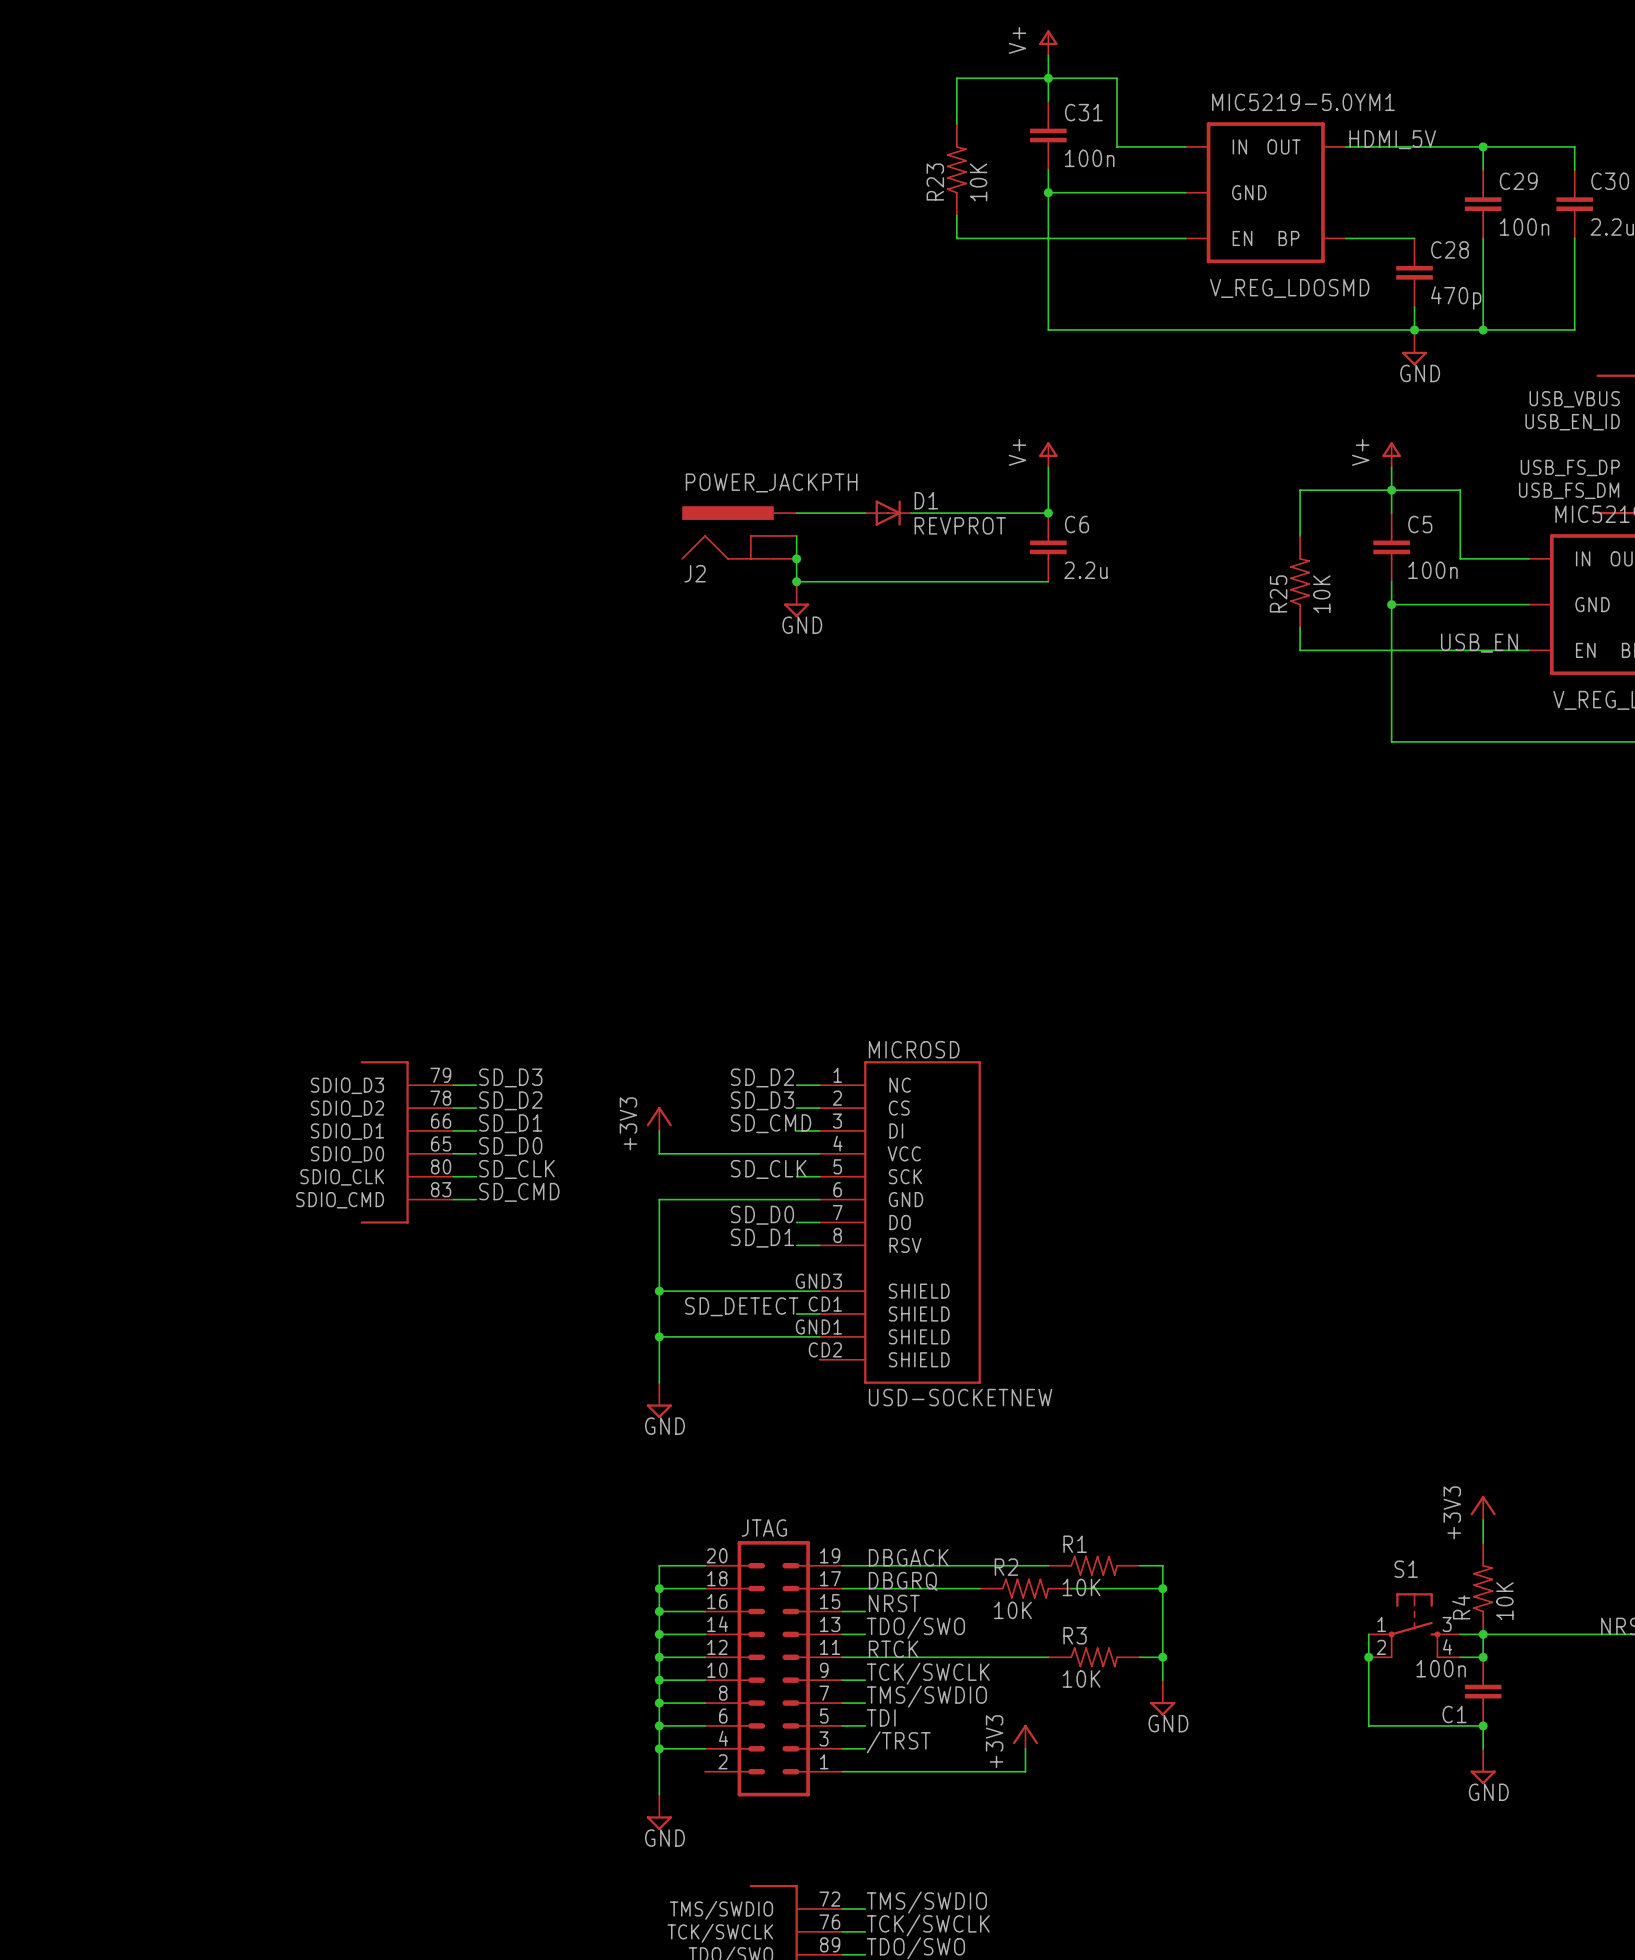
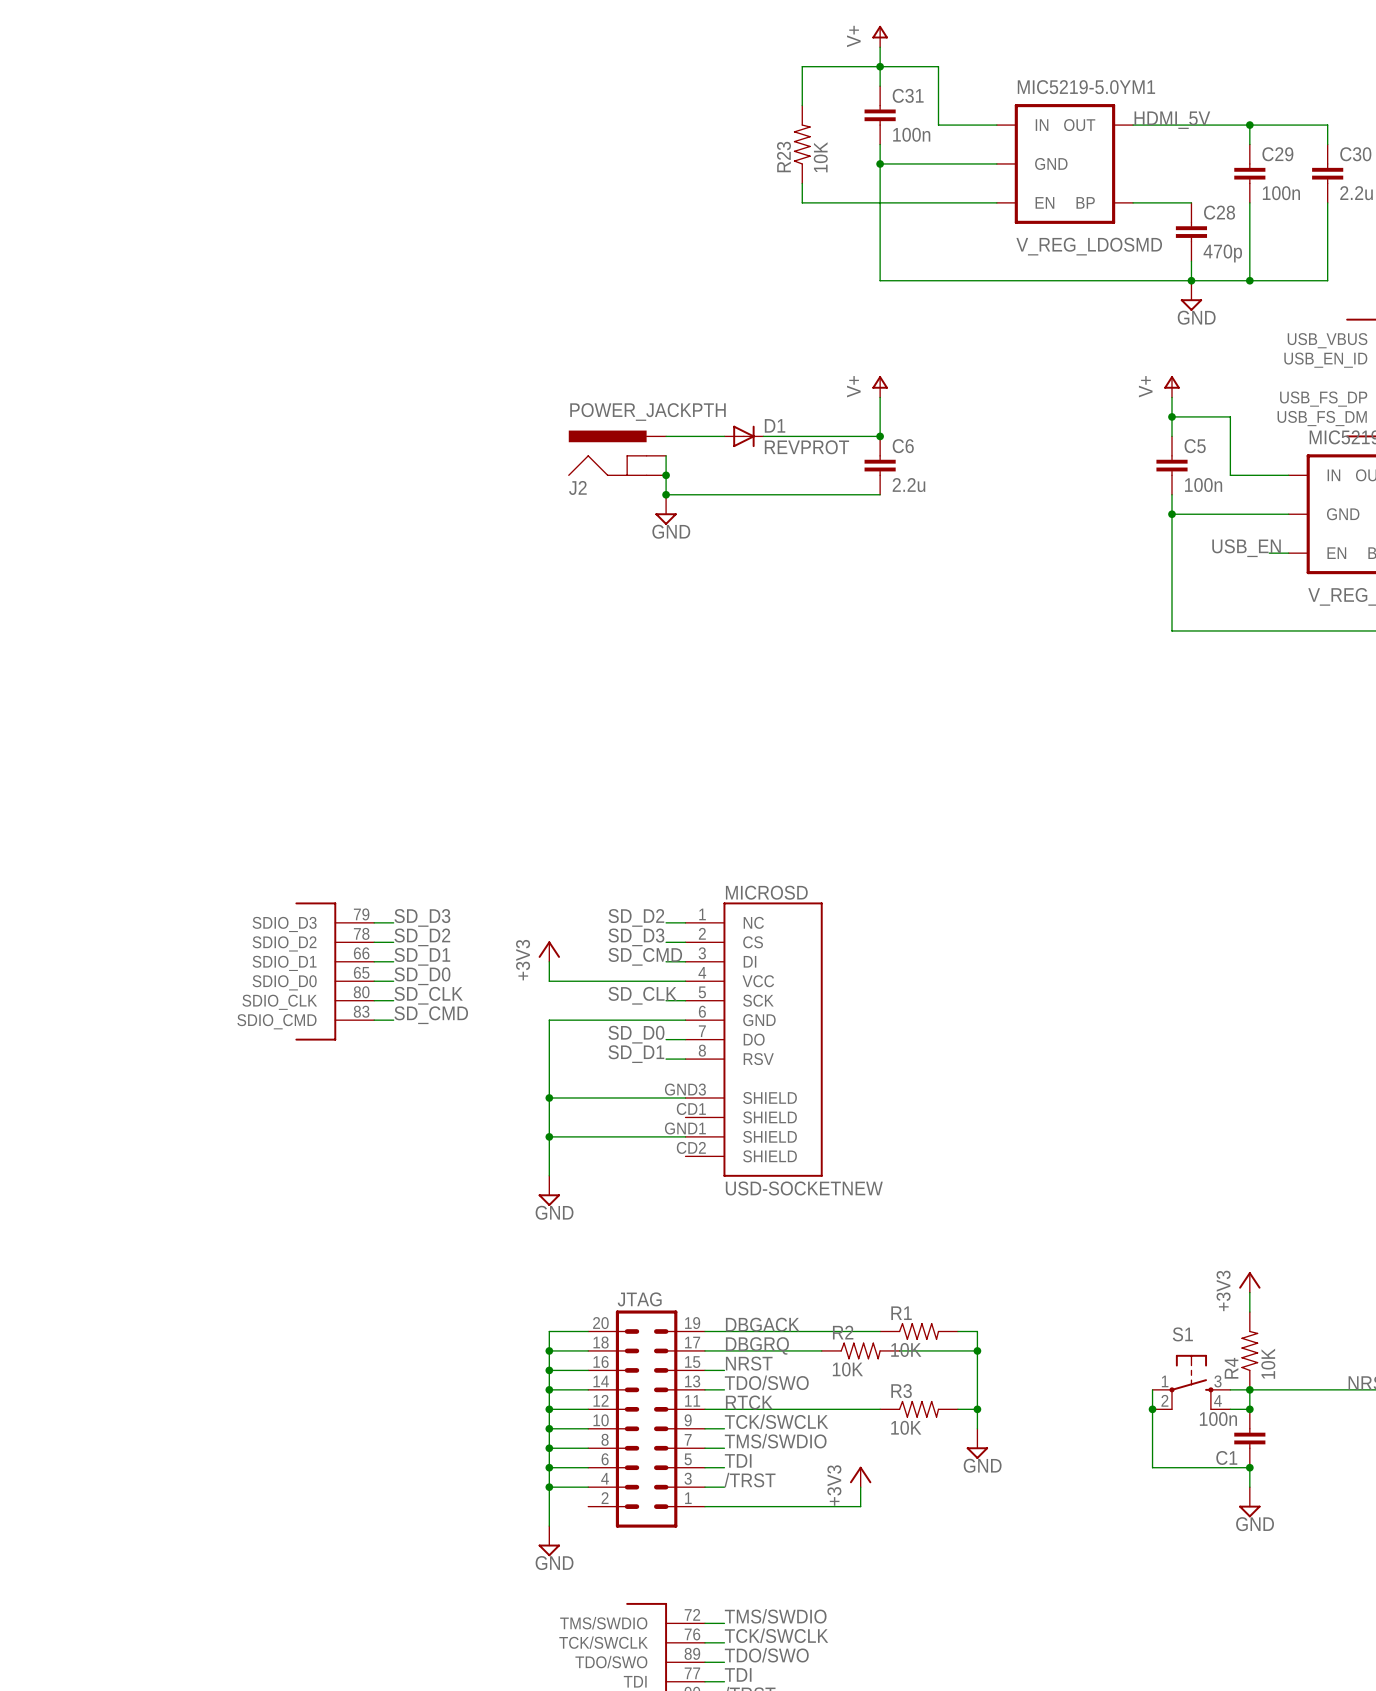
wire: (1391, 490) (1300, 490) (1300, 535) -> none
R25: 10K (1300, 581) -> none
wire: (1300, 627) (1300, 650) (1506, 650) -> none
label: SD_DETECT (741, 1306) -> none
wire: (796, 1314) (819, 1314) -> none

